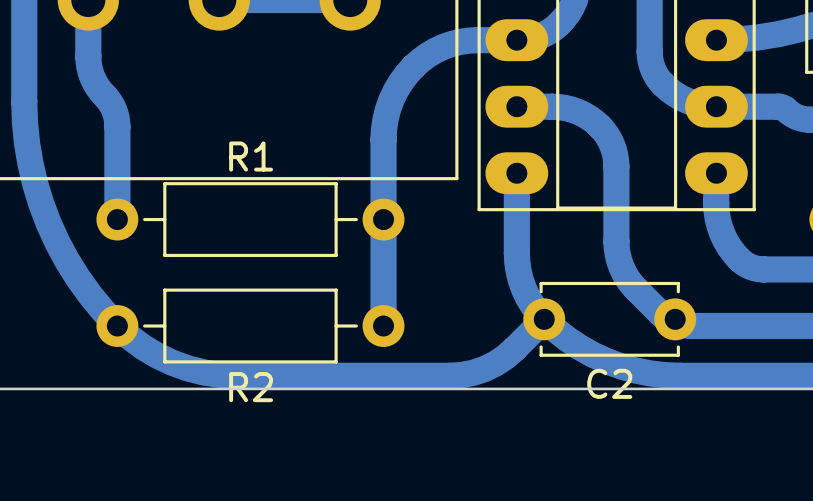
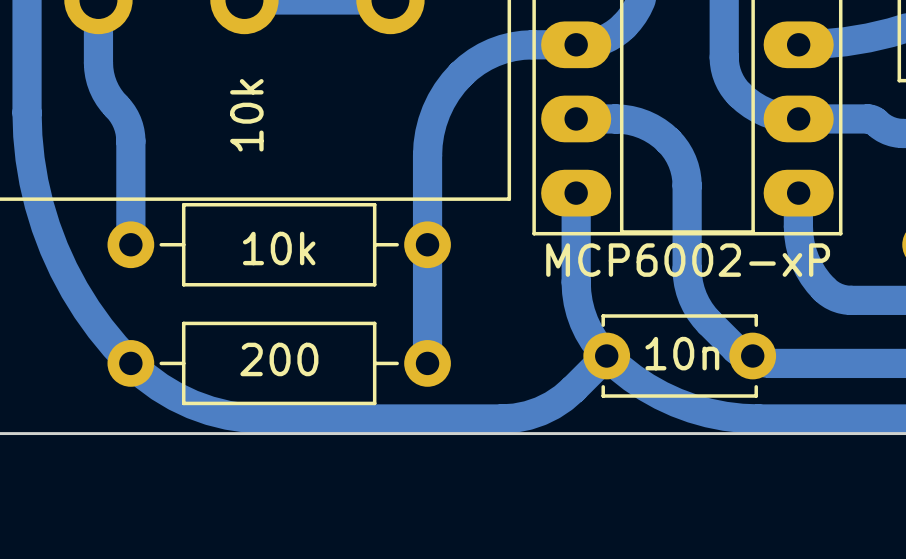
part value: none -> 10k (246, 115)
R1 name: R1 (251, 156) -> none
R1 value: none -> 10k (279, 248)
part value: none -> MCP6002-xP (688, 260)
C2 value: none -> 10n (682, 353)
R2 value: none -> 200 (279, 359)
C2 name: C2 (609, 383) -> none
R2 name: R2 (251, 387) -> none

